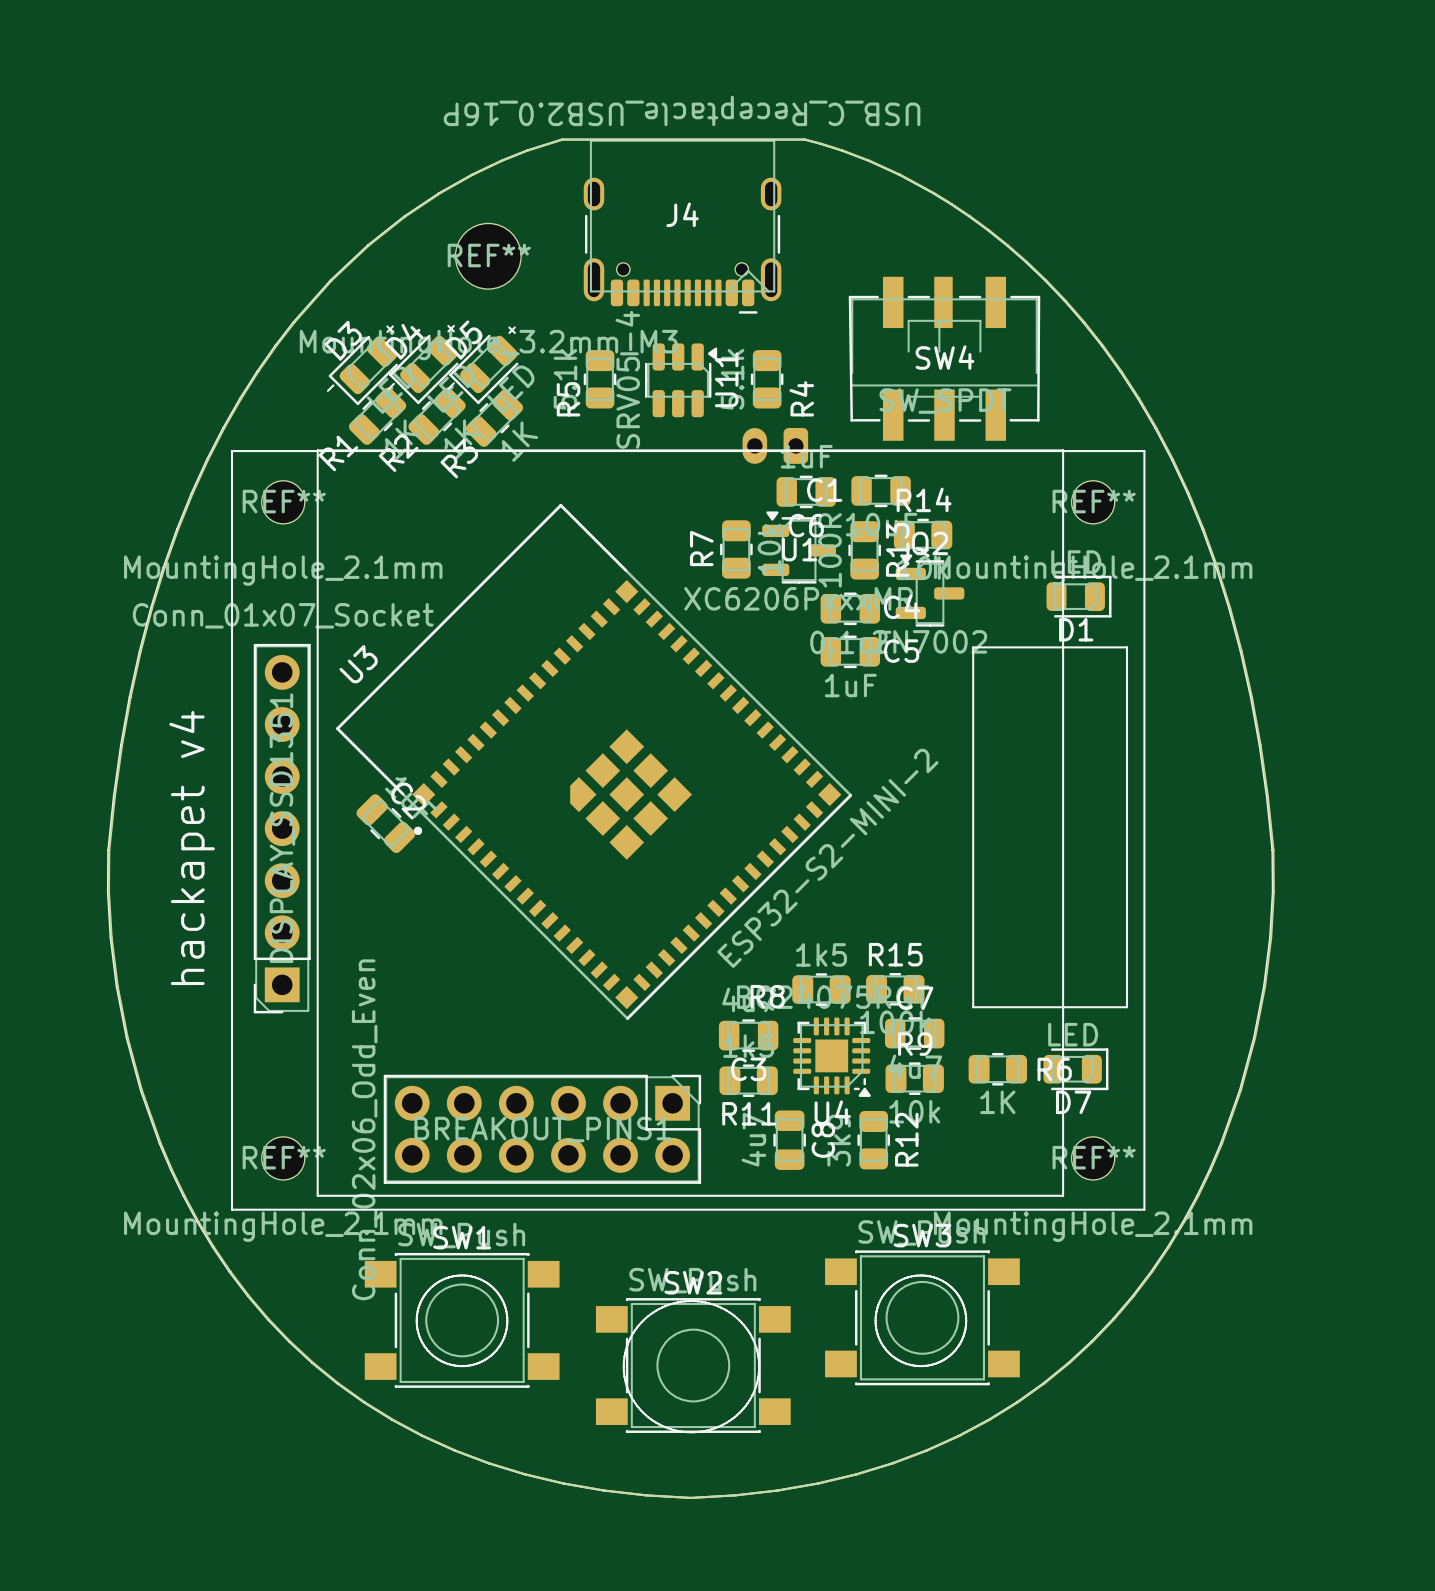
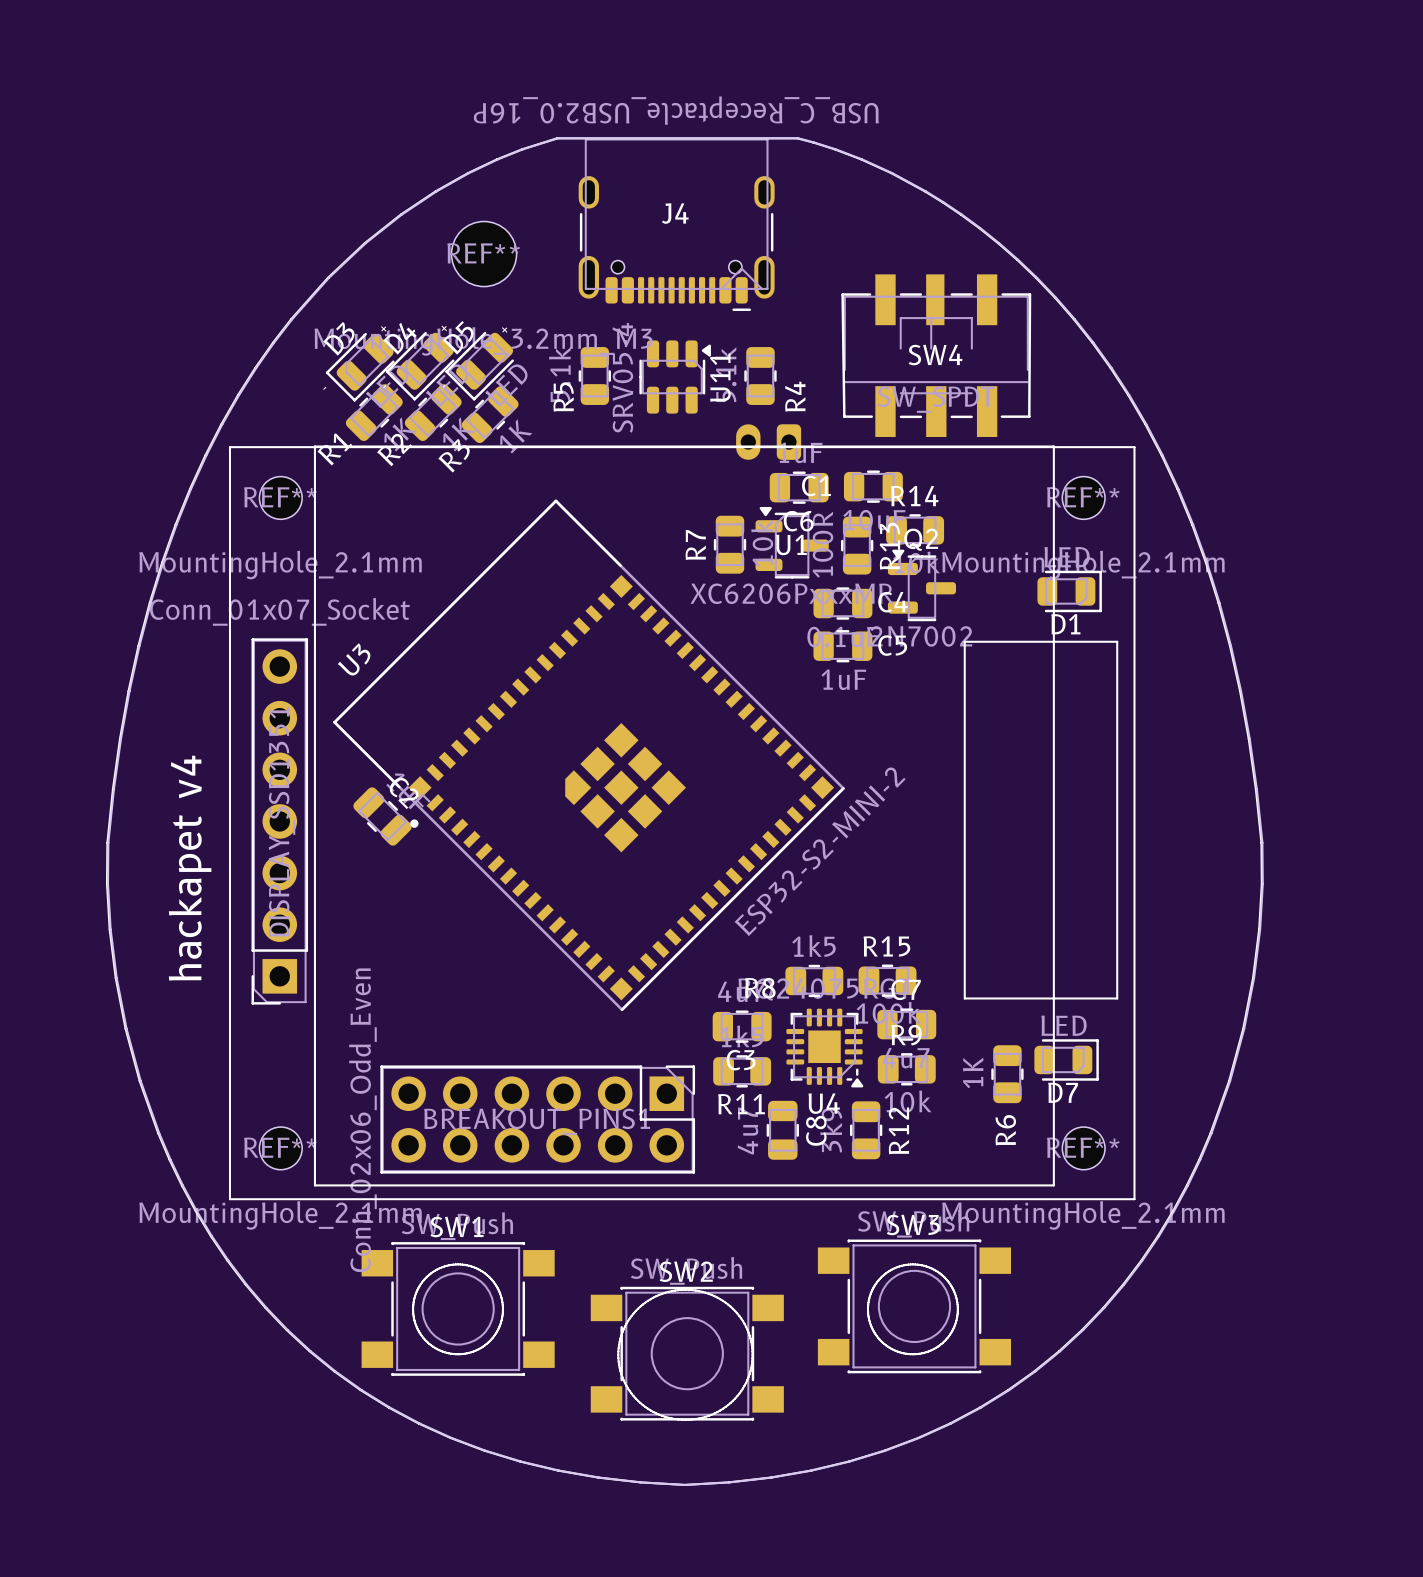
R6 rotation: 0° (997, 1069) -> 90° clockwise (1007, 1074)

